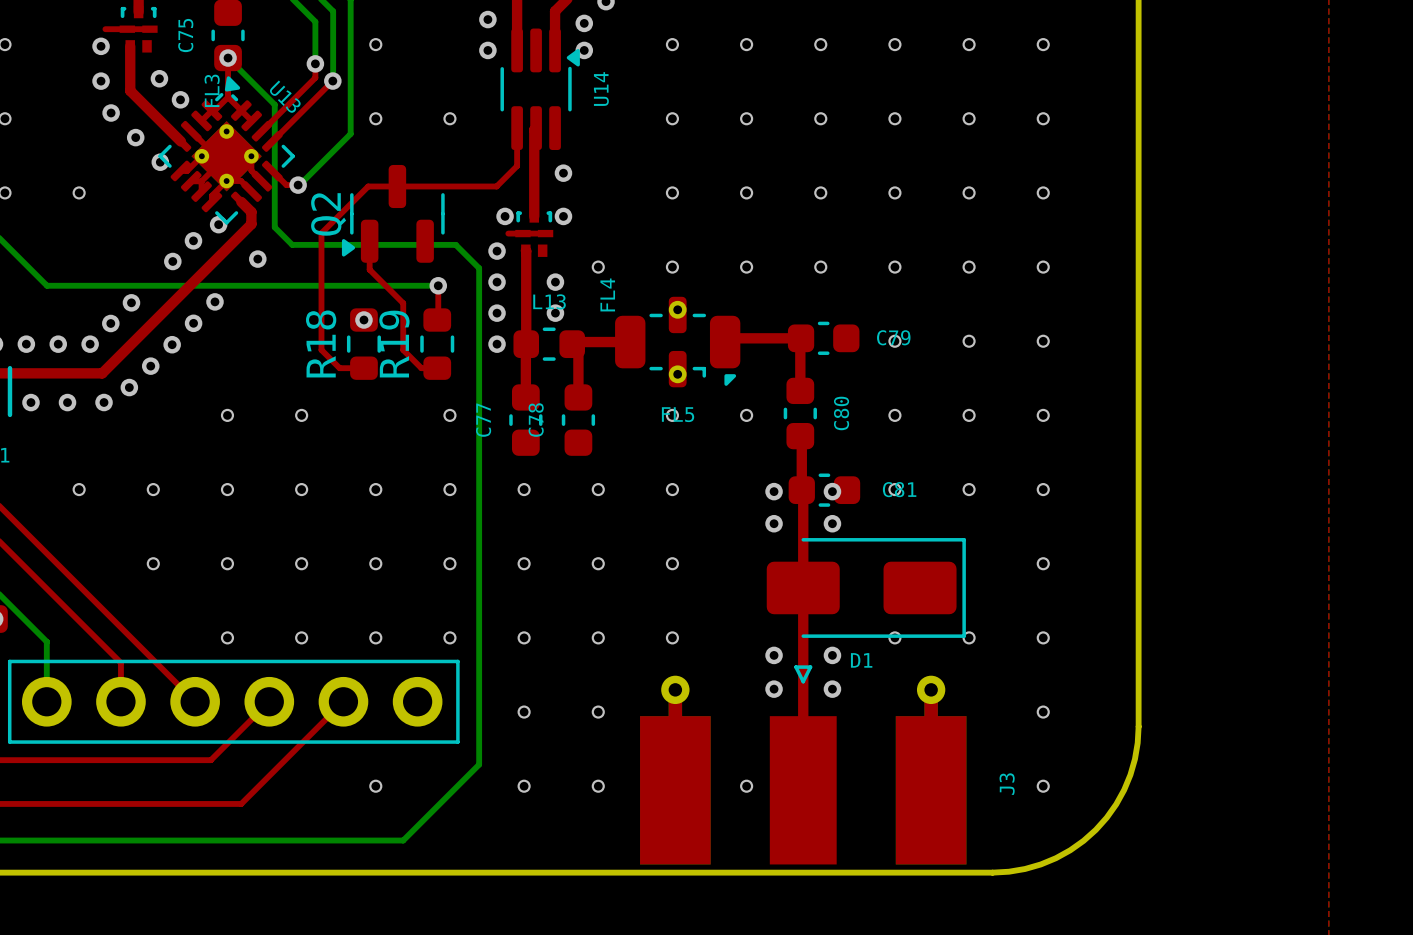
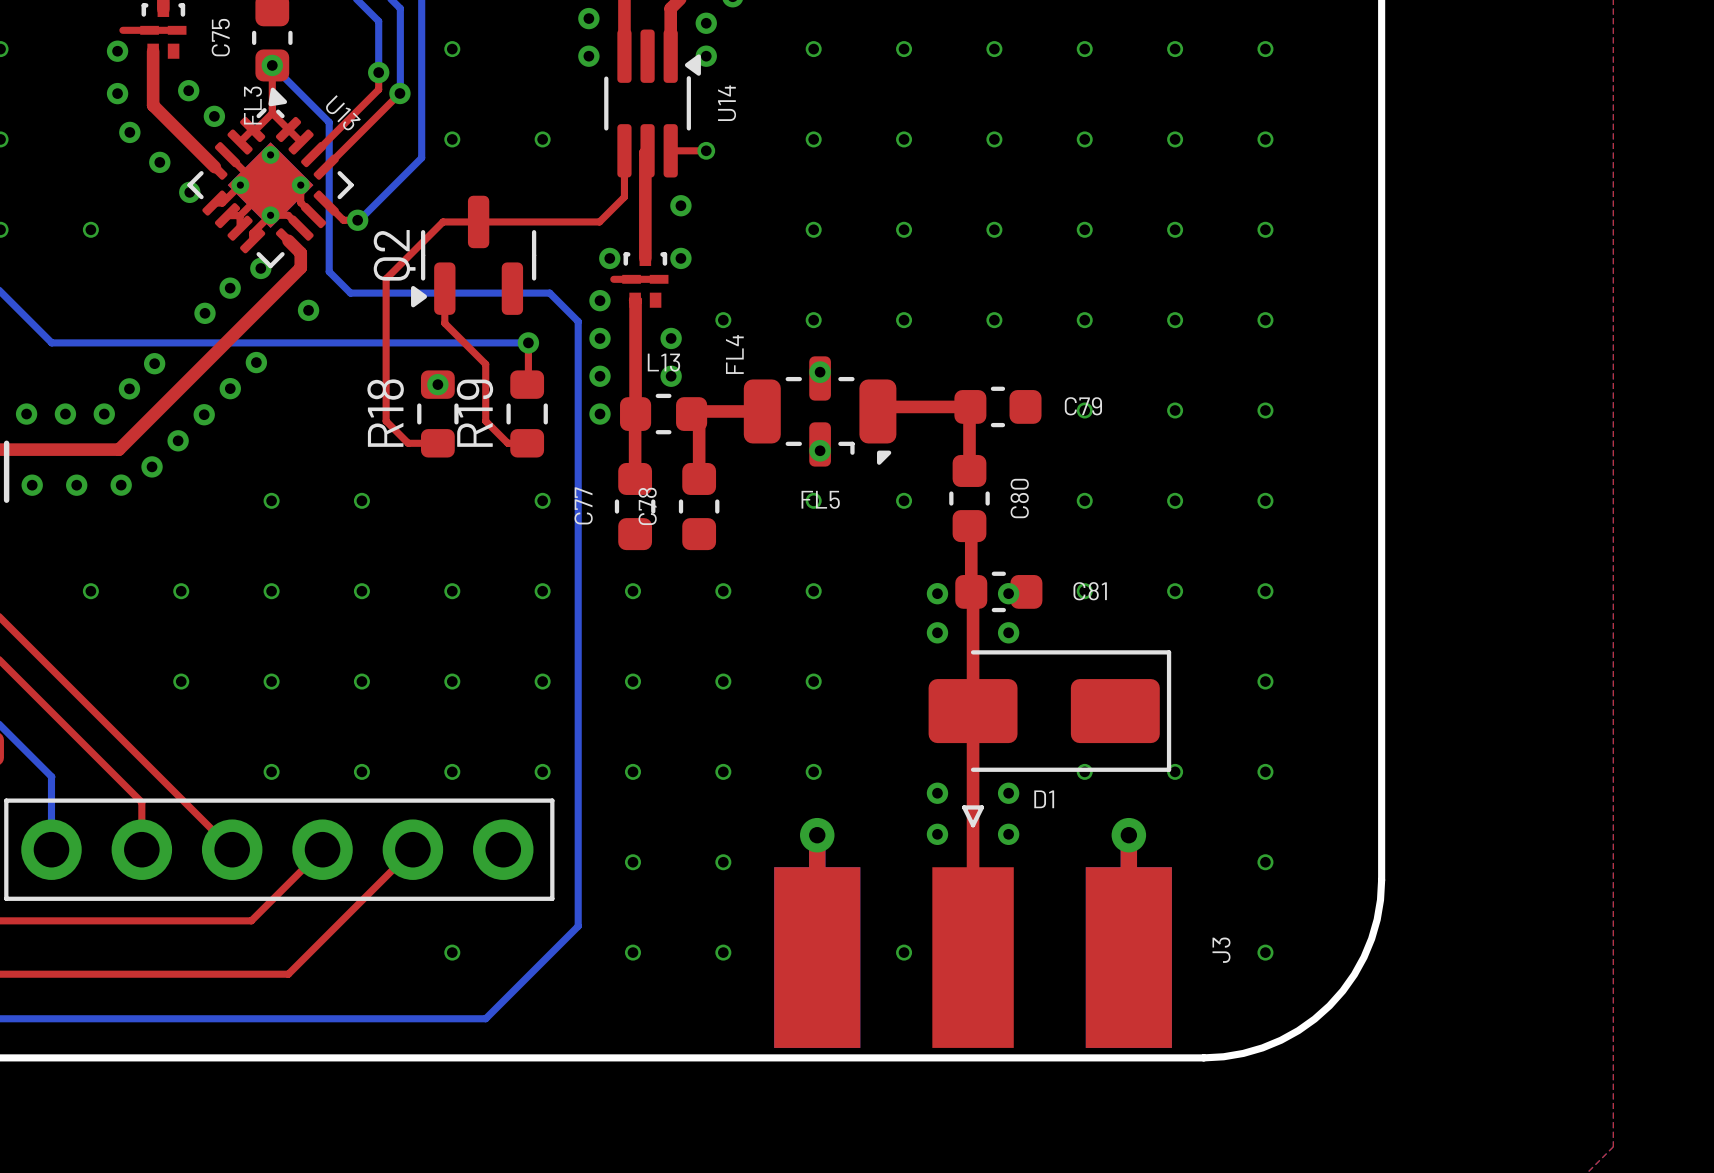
top track: none -> (670, 150) (706, 150)
via: none -> (706, 150)

